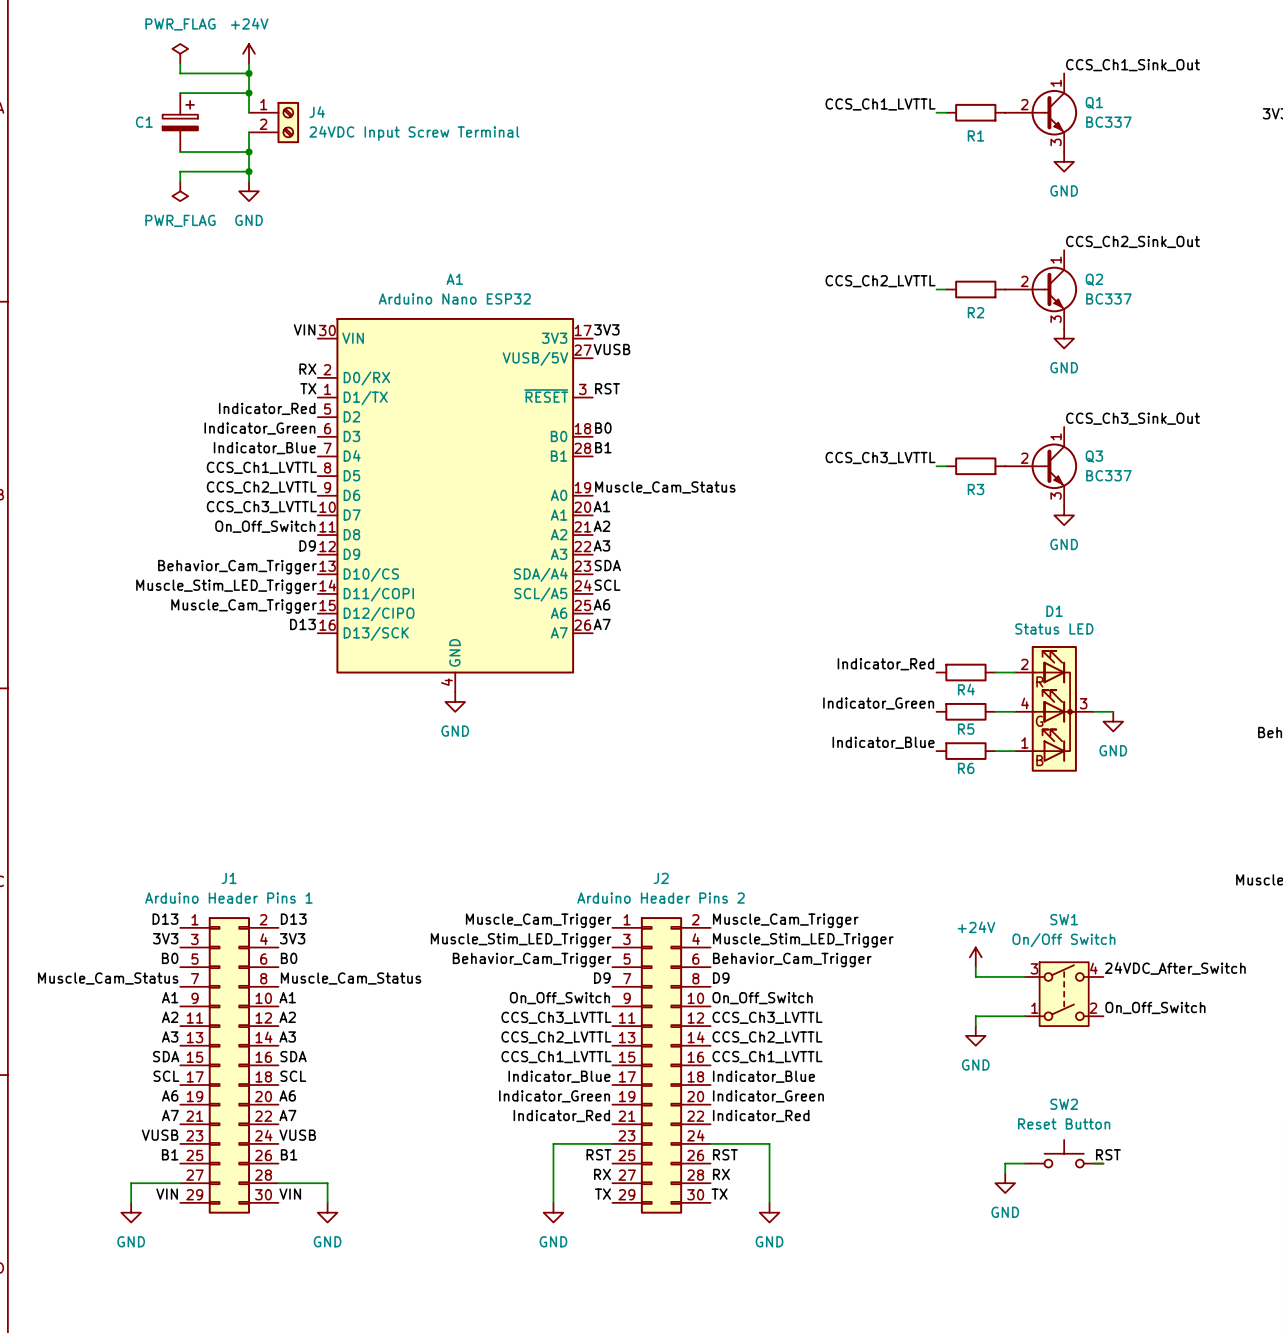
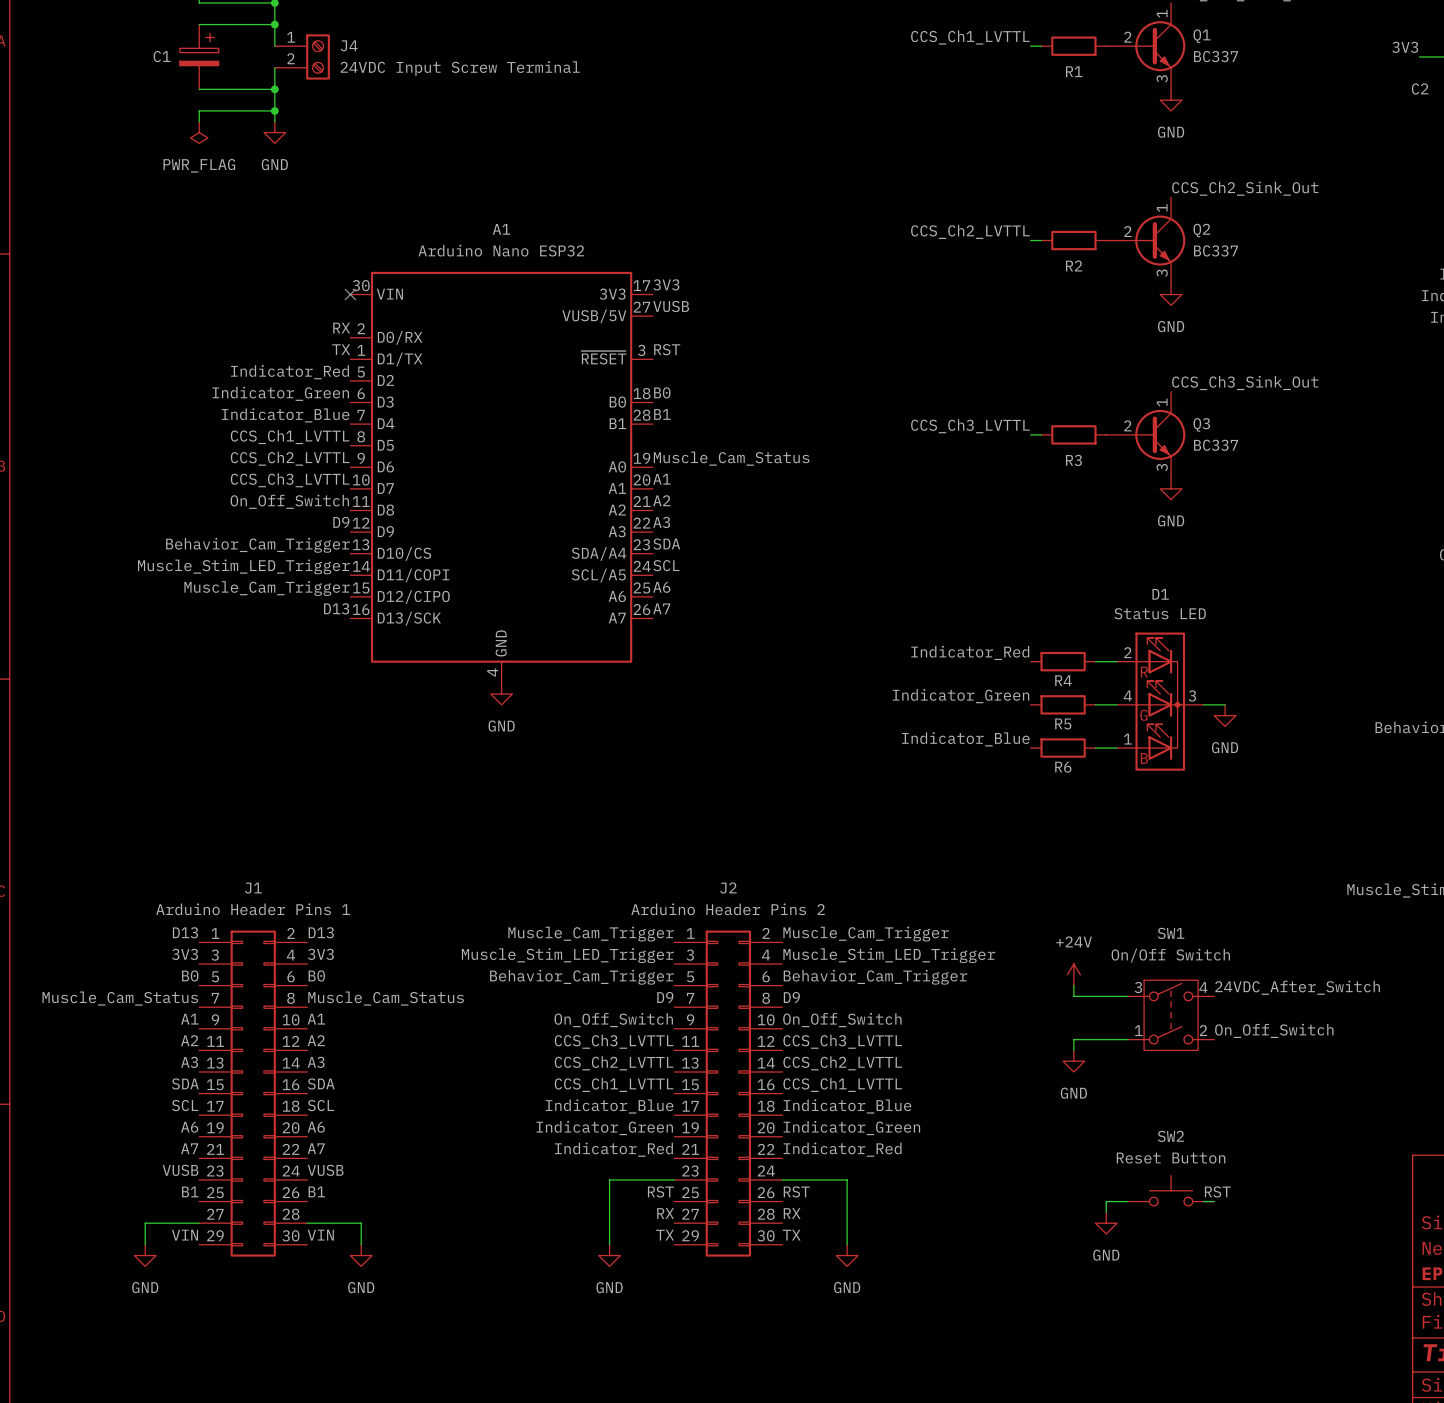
label: VIN (304, 329) -> none
no-connect mark: none -> (350, 294)

